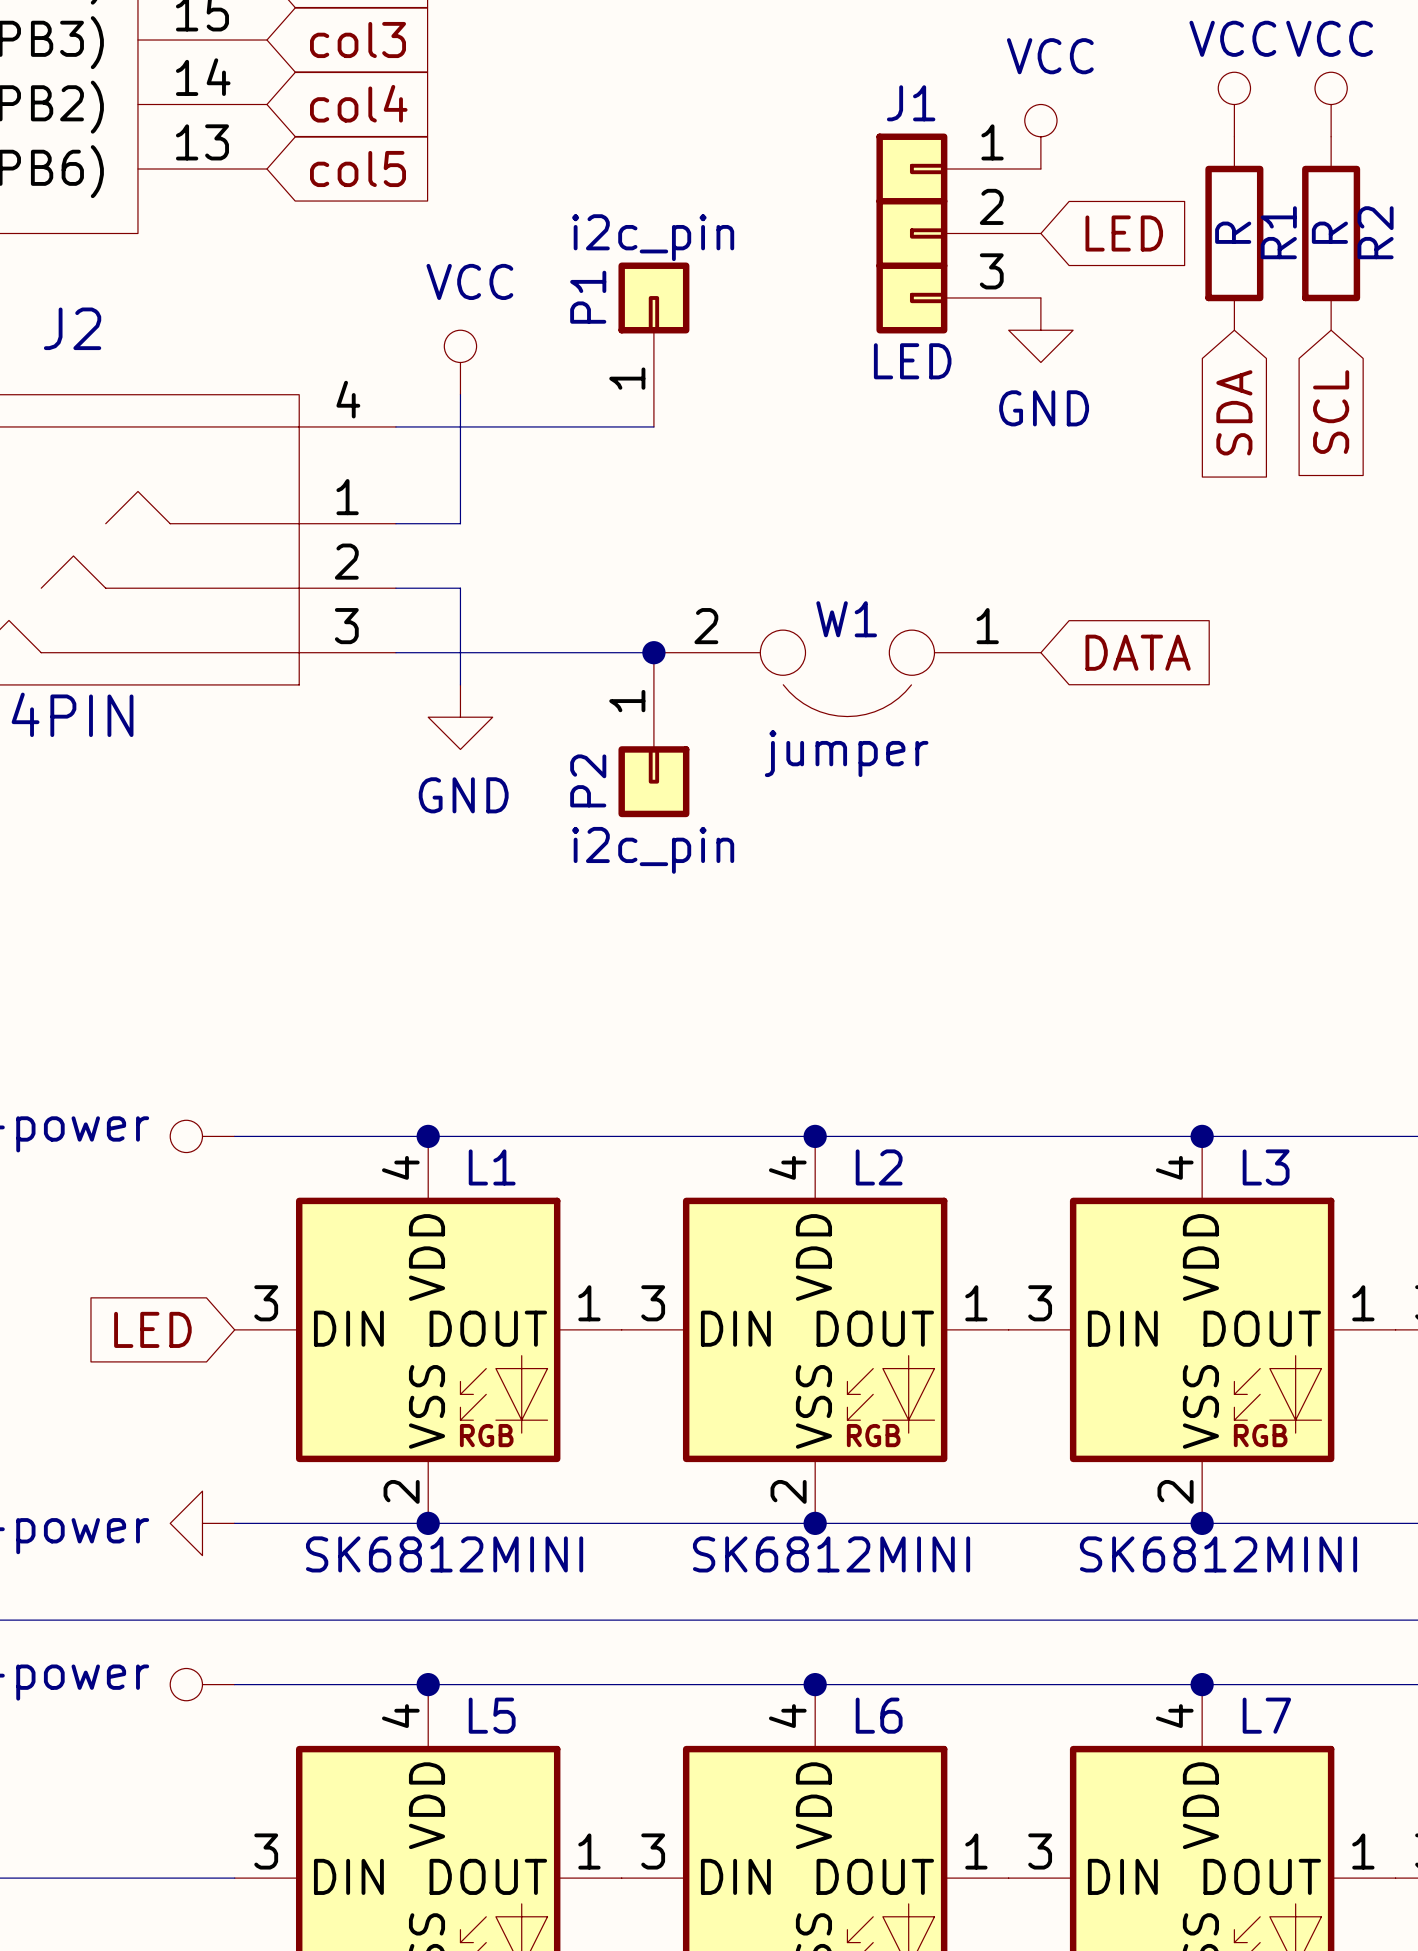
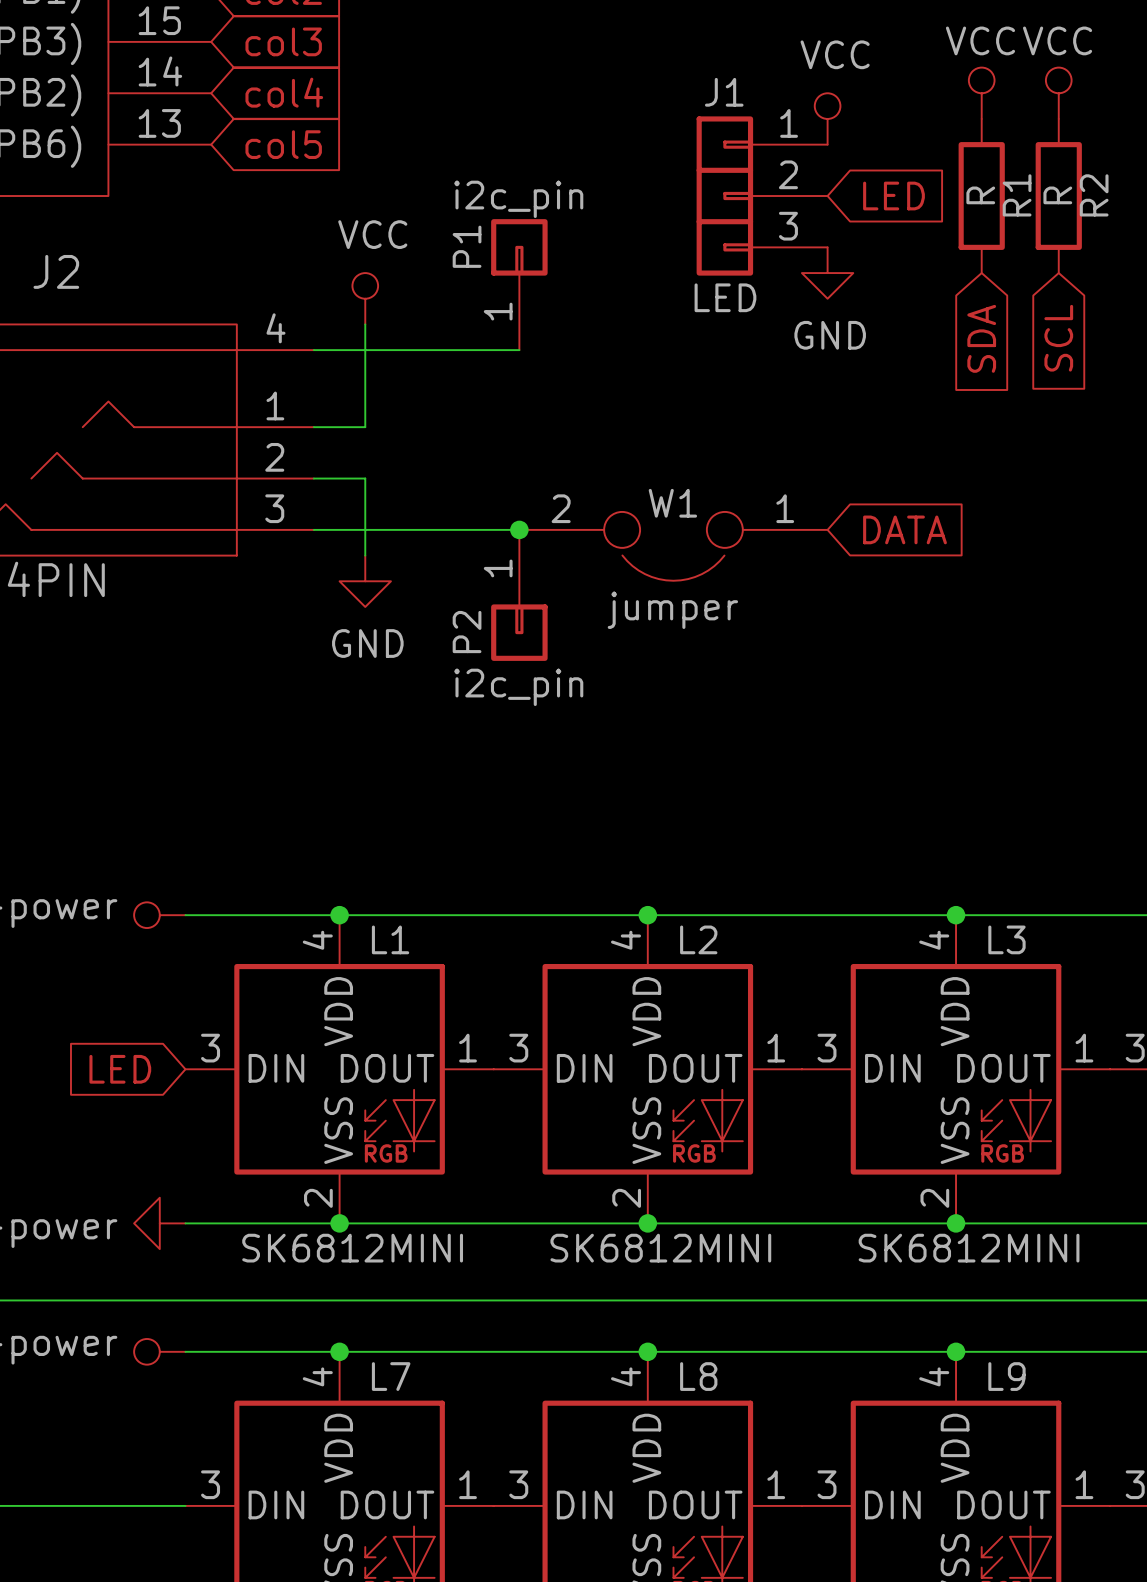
L5 name: L5 (492, 1715) -> L7 (391, 1376)
L6 name: L6 (879, 1715) -> L8 (698, 1376)
L7 name: L7 (1266, 1715) -> L9 (1006, 1376)

